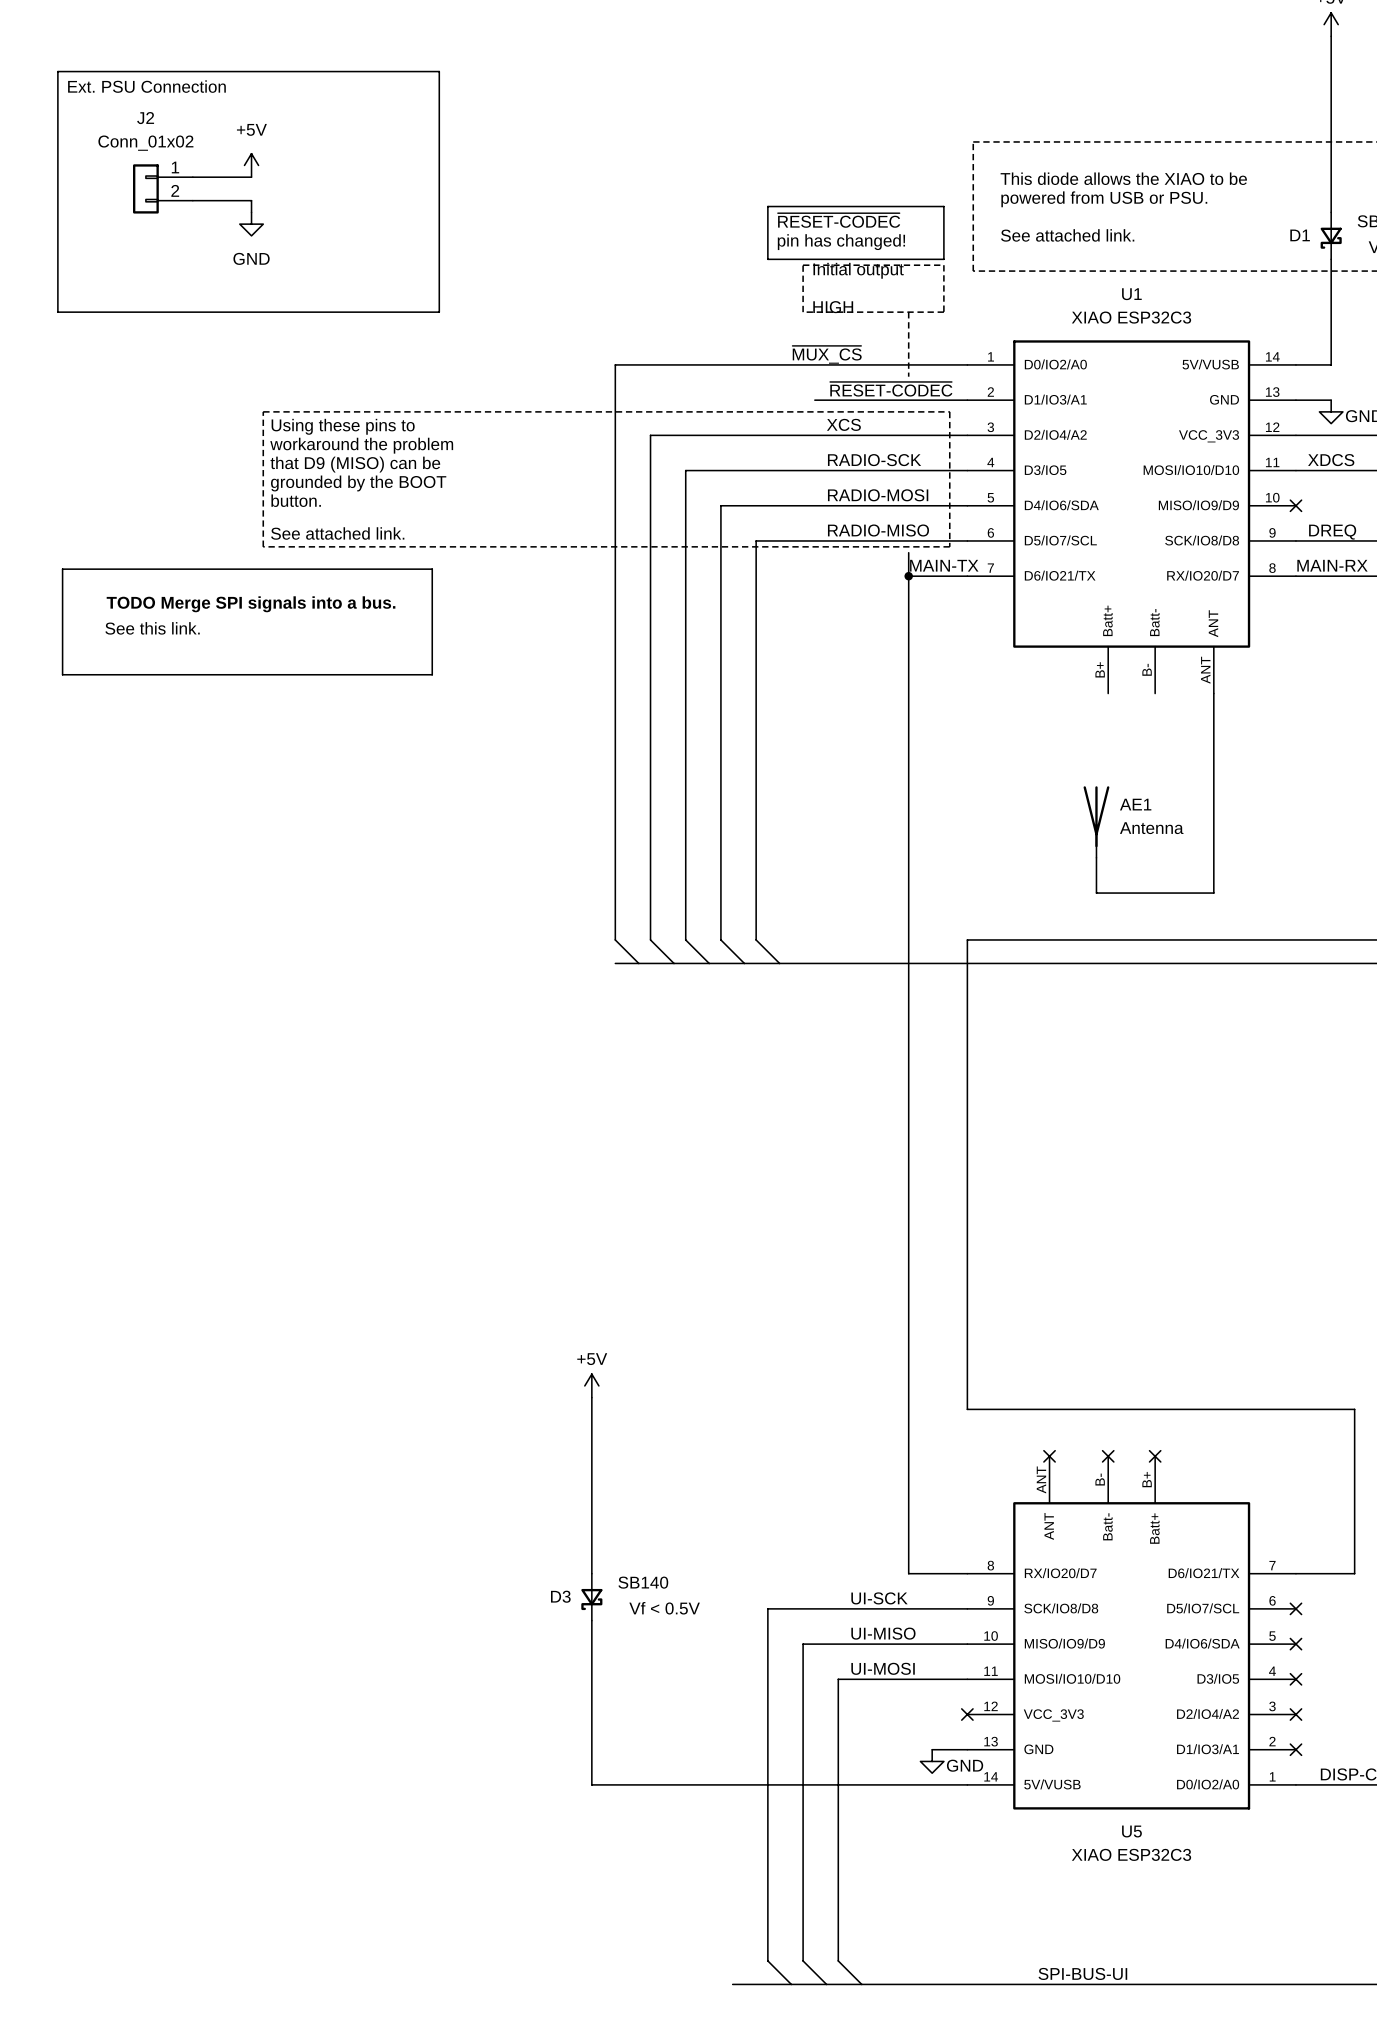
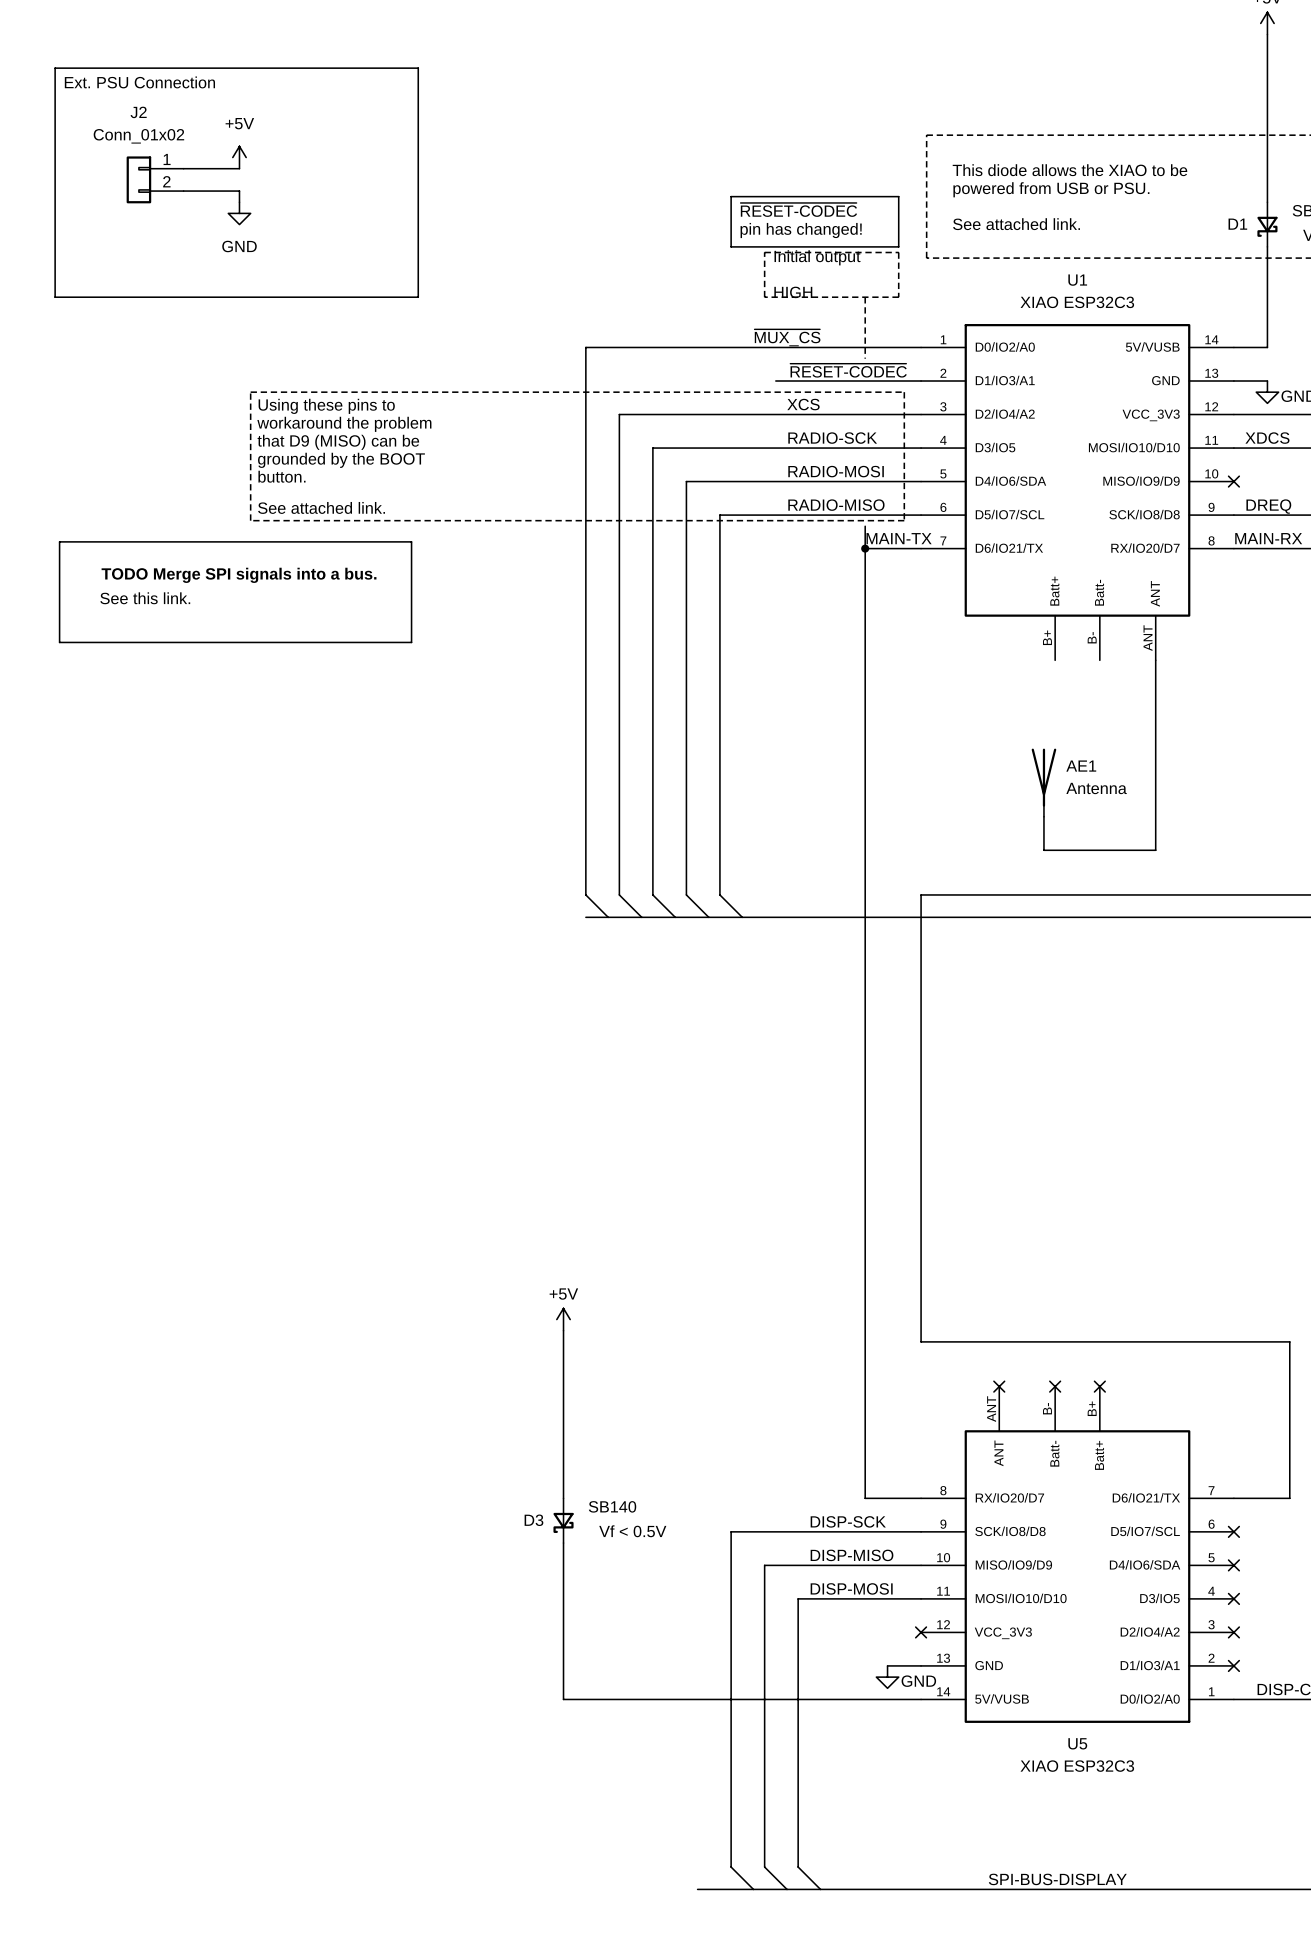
label: UI-SCK (879, 1598) -> DISP-SCK (848, 1521)
label: UI-MISO (883, 1633) -> DISP-MISO (852, 1555)
label: UI-MOSI (883, 1668) -> DISP-MOSI (851, 1588)
label: SPI-BUS-UI (1082, 1973) -> SPI-BUS-DISPLAY (1057, 1879)

